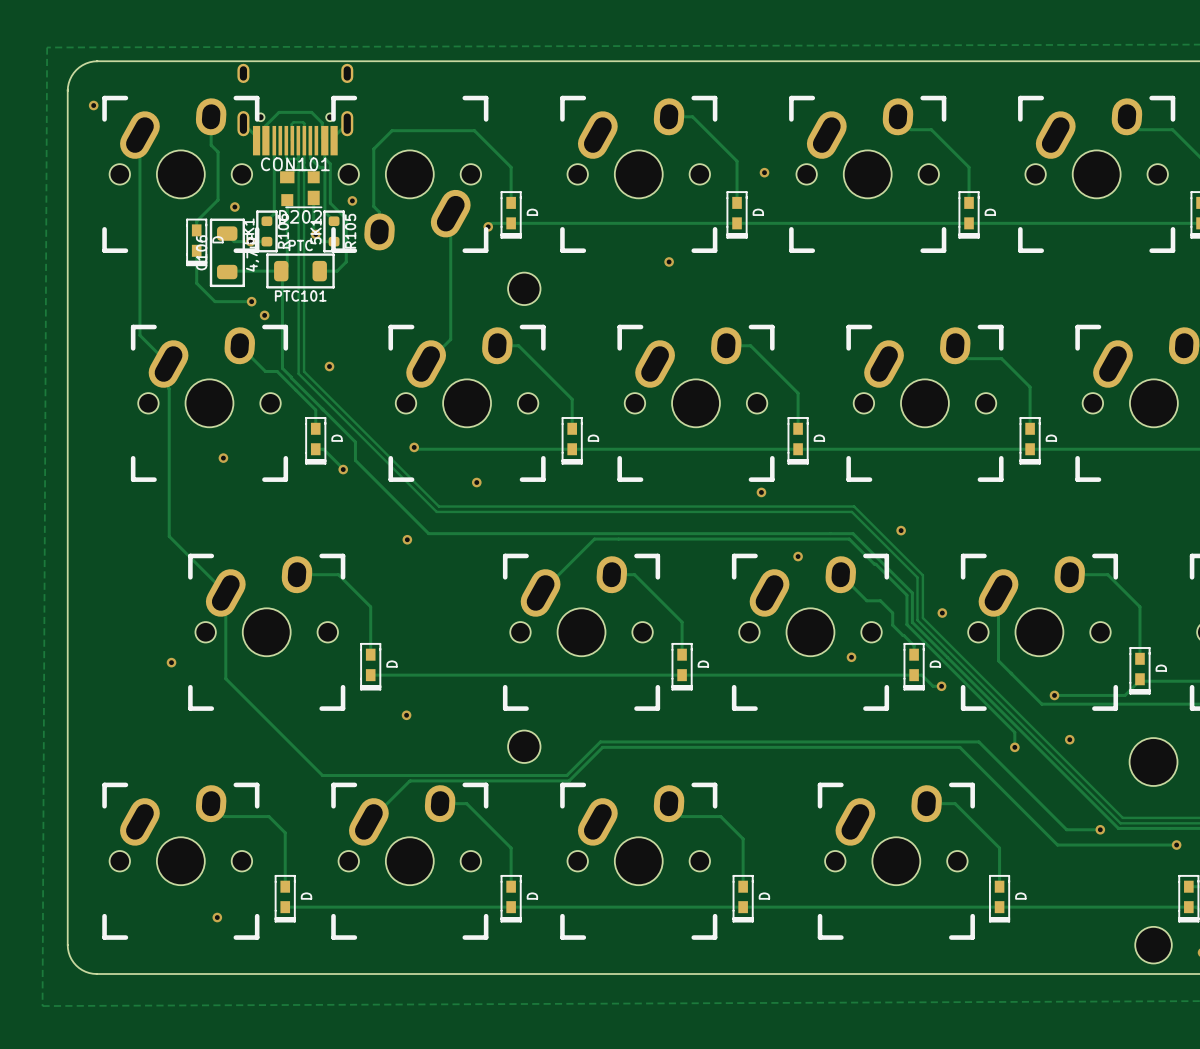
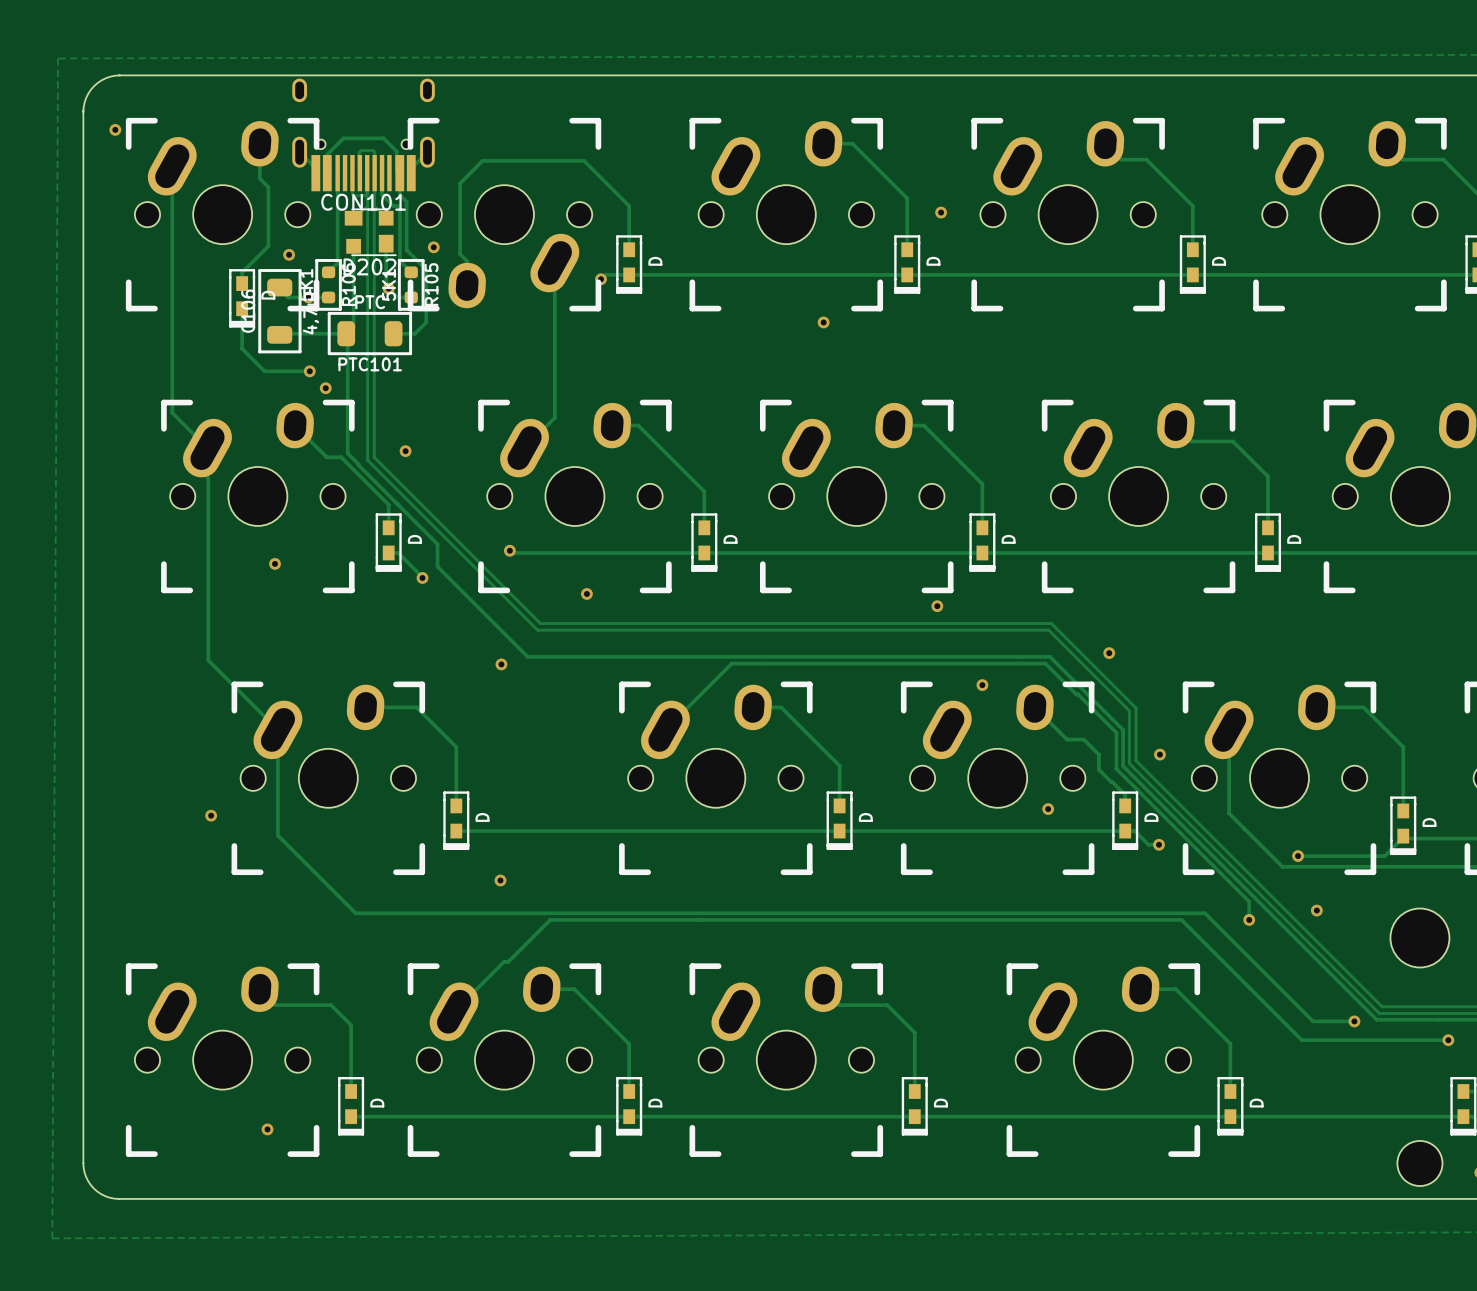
part: (524, 288) -> none
track: (288, 741) (322, 775) (566, 775) (600, 741) -> (355, 913) (739, 913)
part: (524, 746) -> none
track: (602, 747) (569, 780) (410, 781) -> (741, 919) (550, 919) (508, 961) (504, 961)

